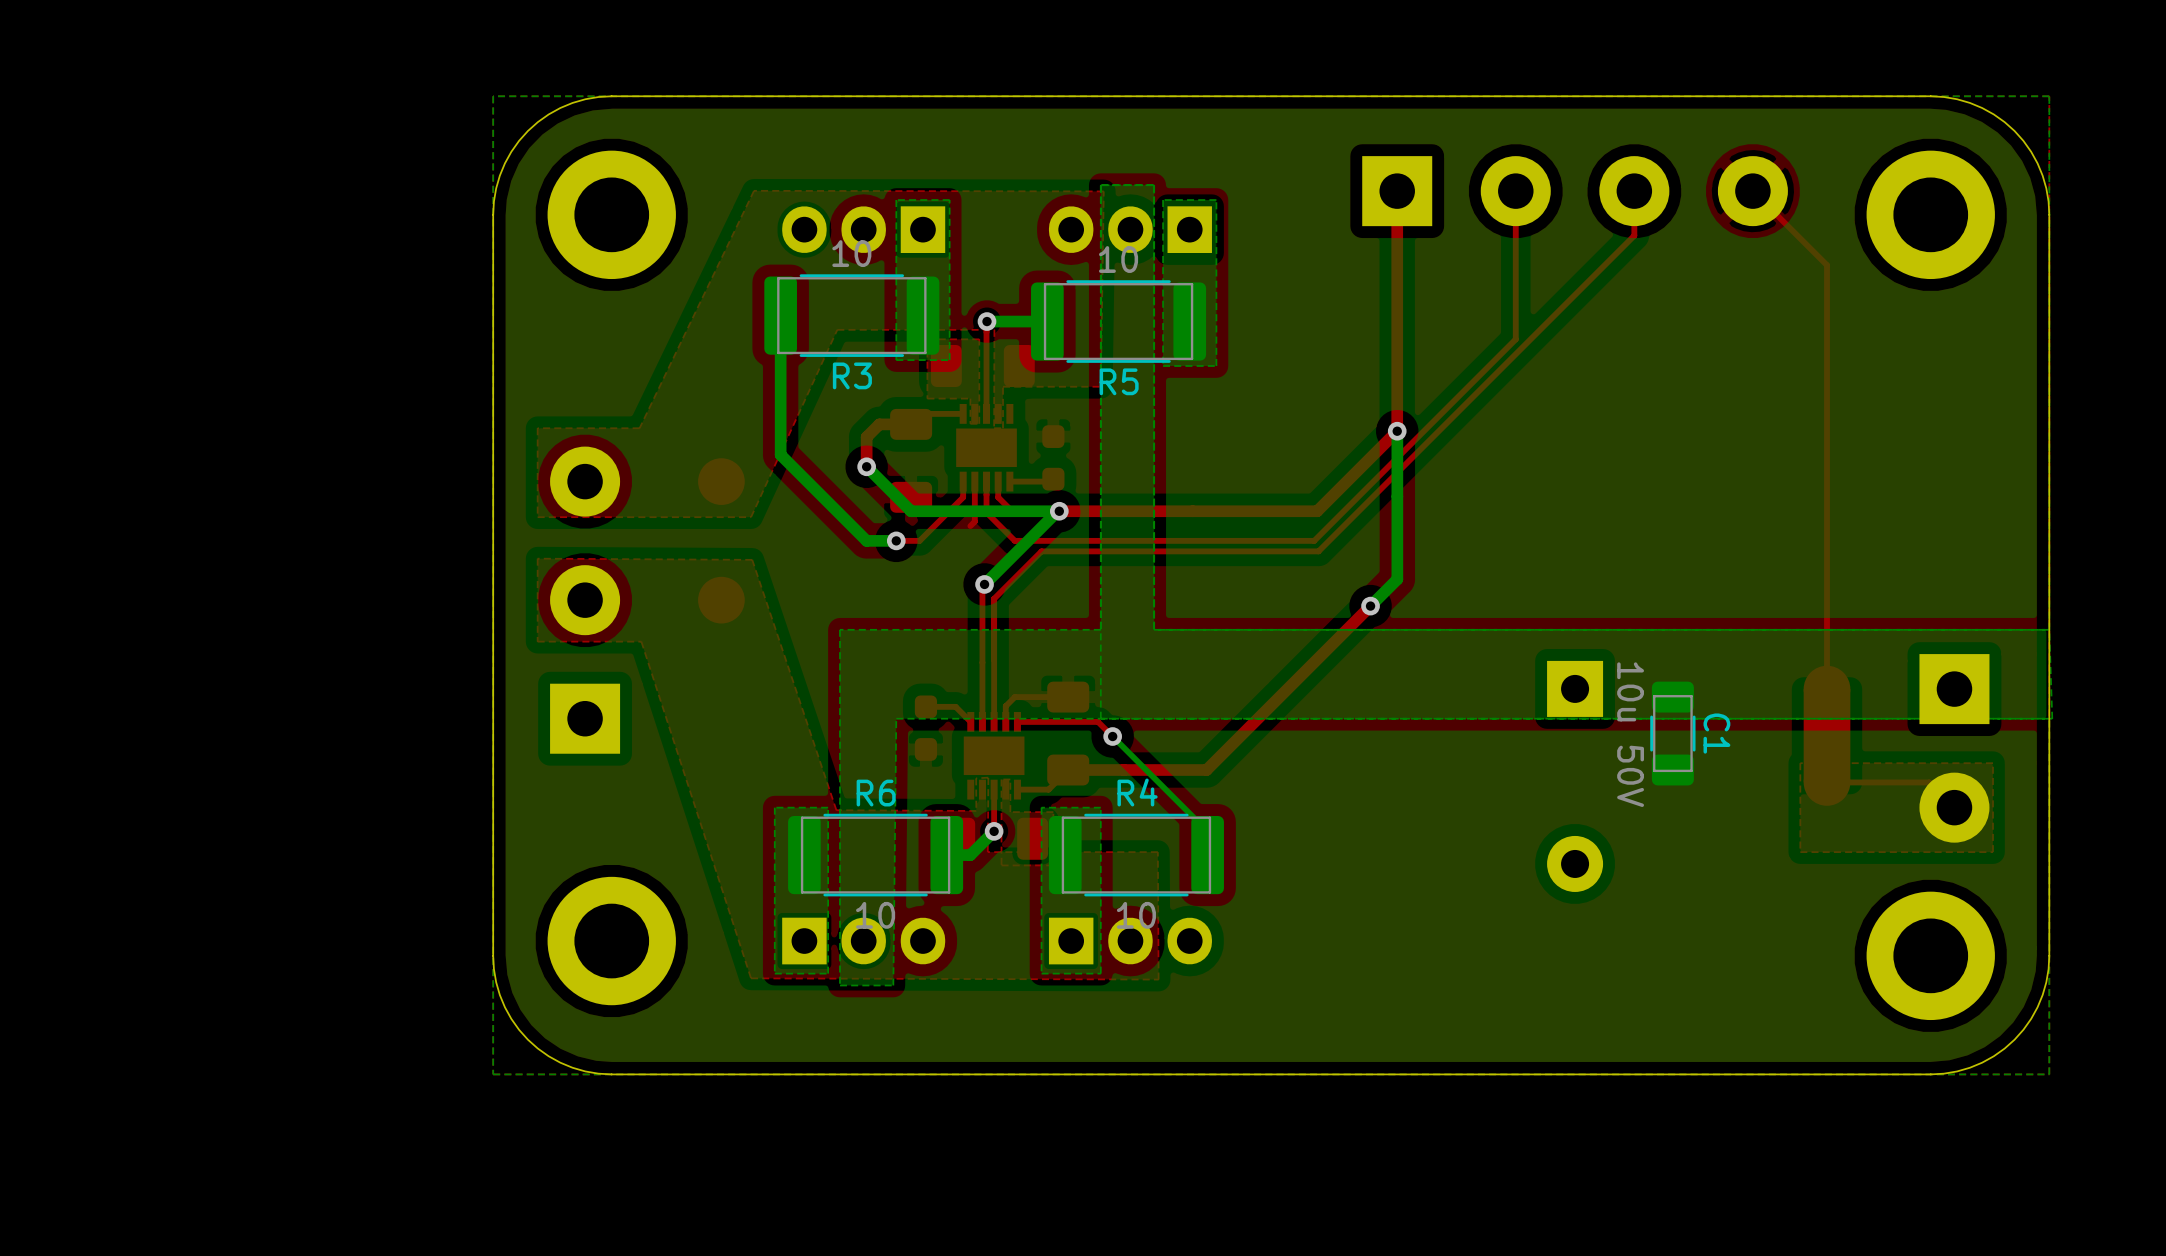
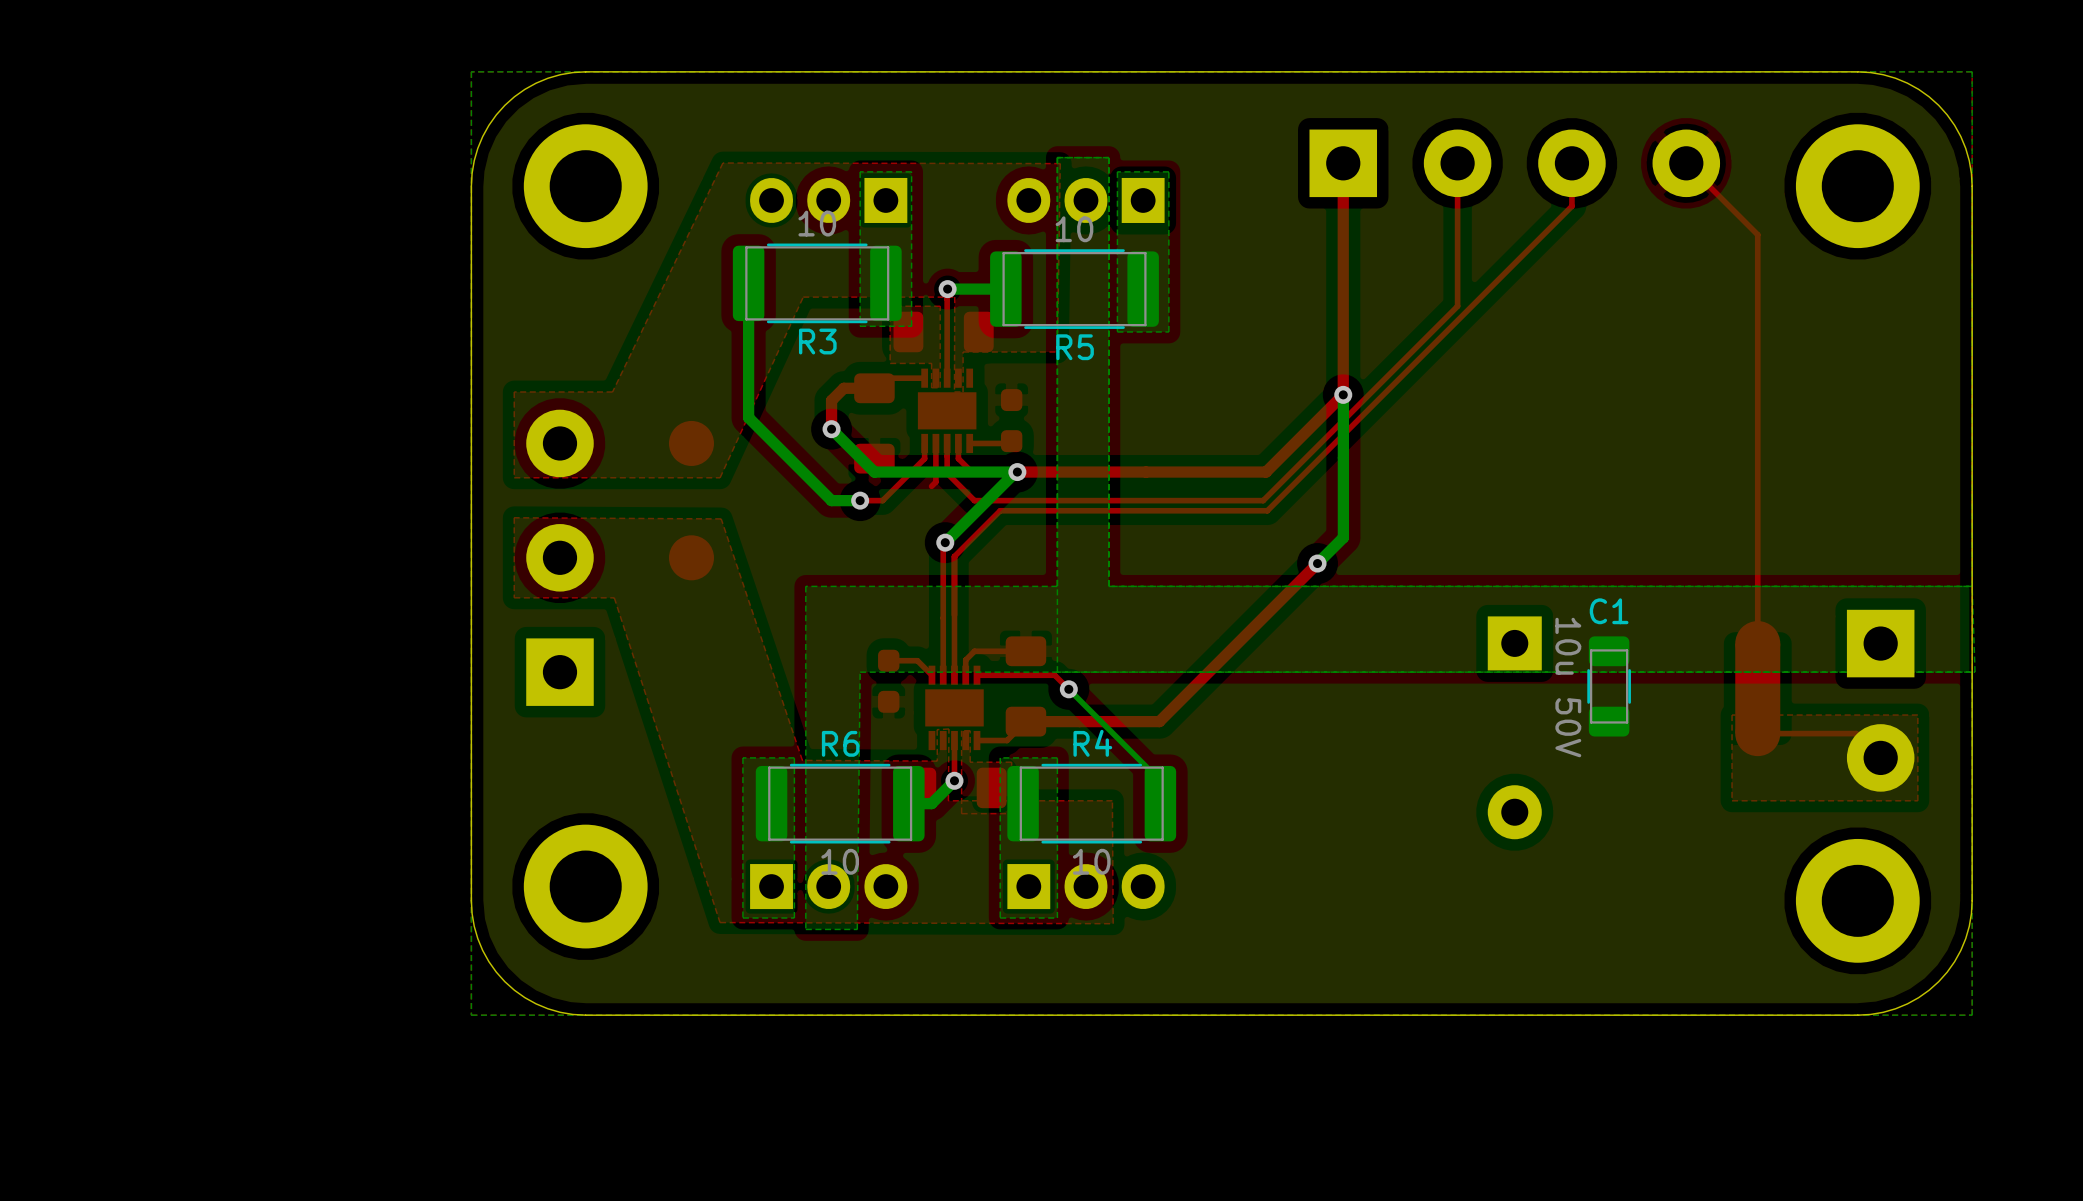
C1 name rotation: 0° (1716, 733) -> 90° counterclockwise (1609, 611)
C1 name position: C1 (1716, 733) -> C1 (1609, 611)

